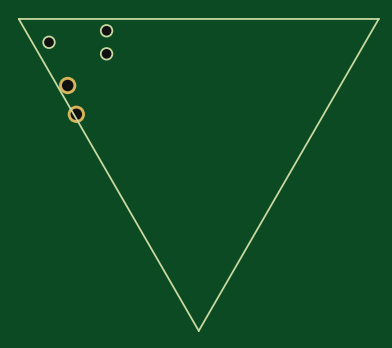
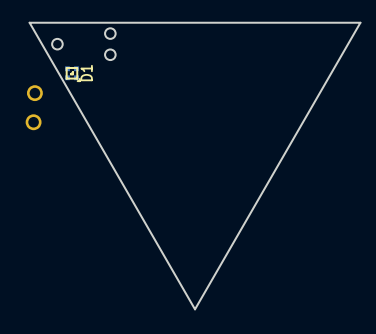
D1: none -> (72, 74)
part: (67, 85) -> none
part: none -> (34, 93)
part: (76, 114) -> none
part: none -> (33, 122)

